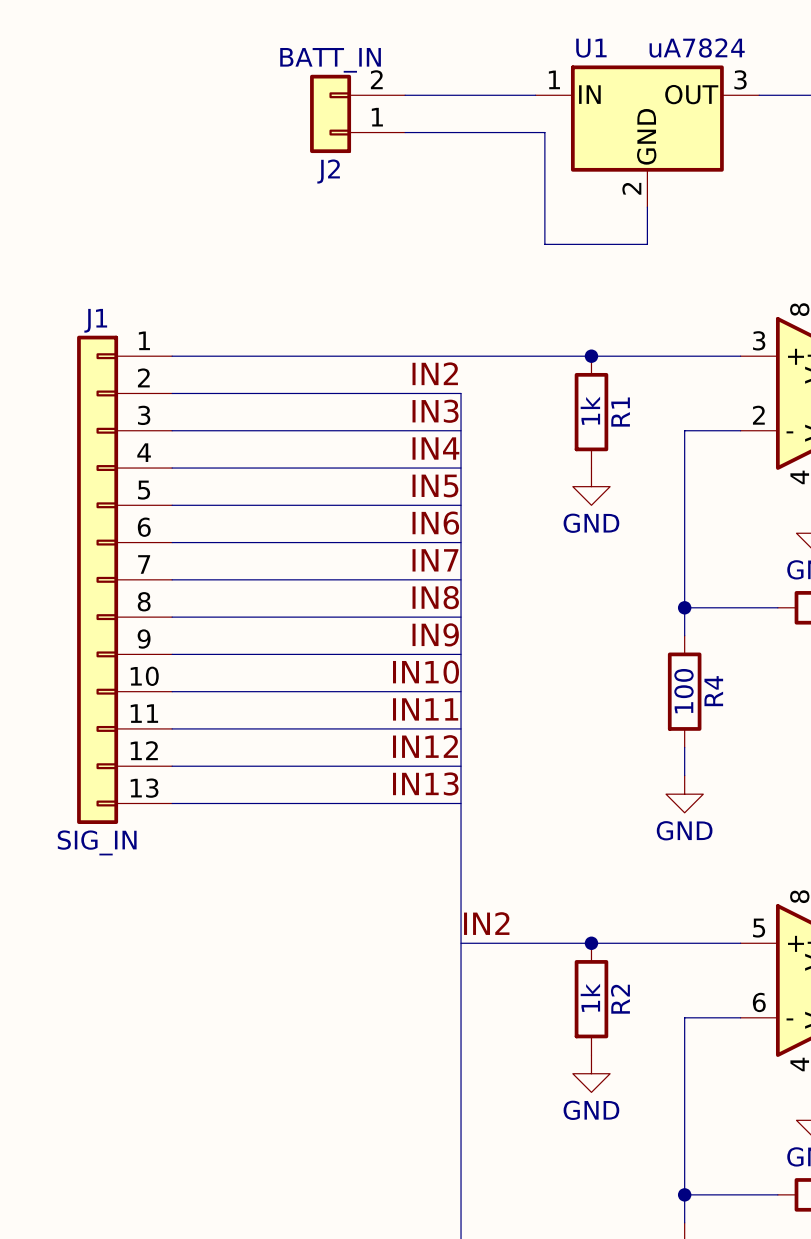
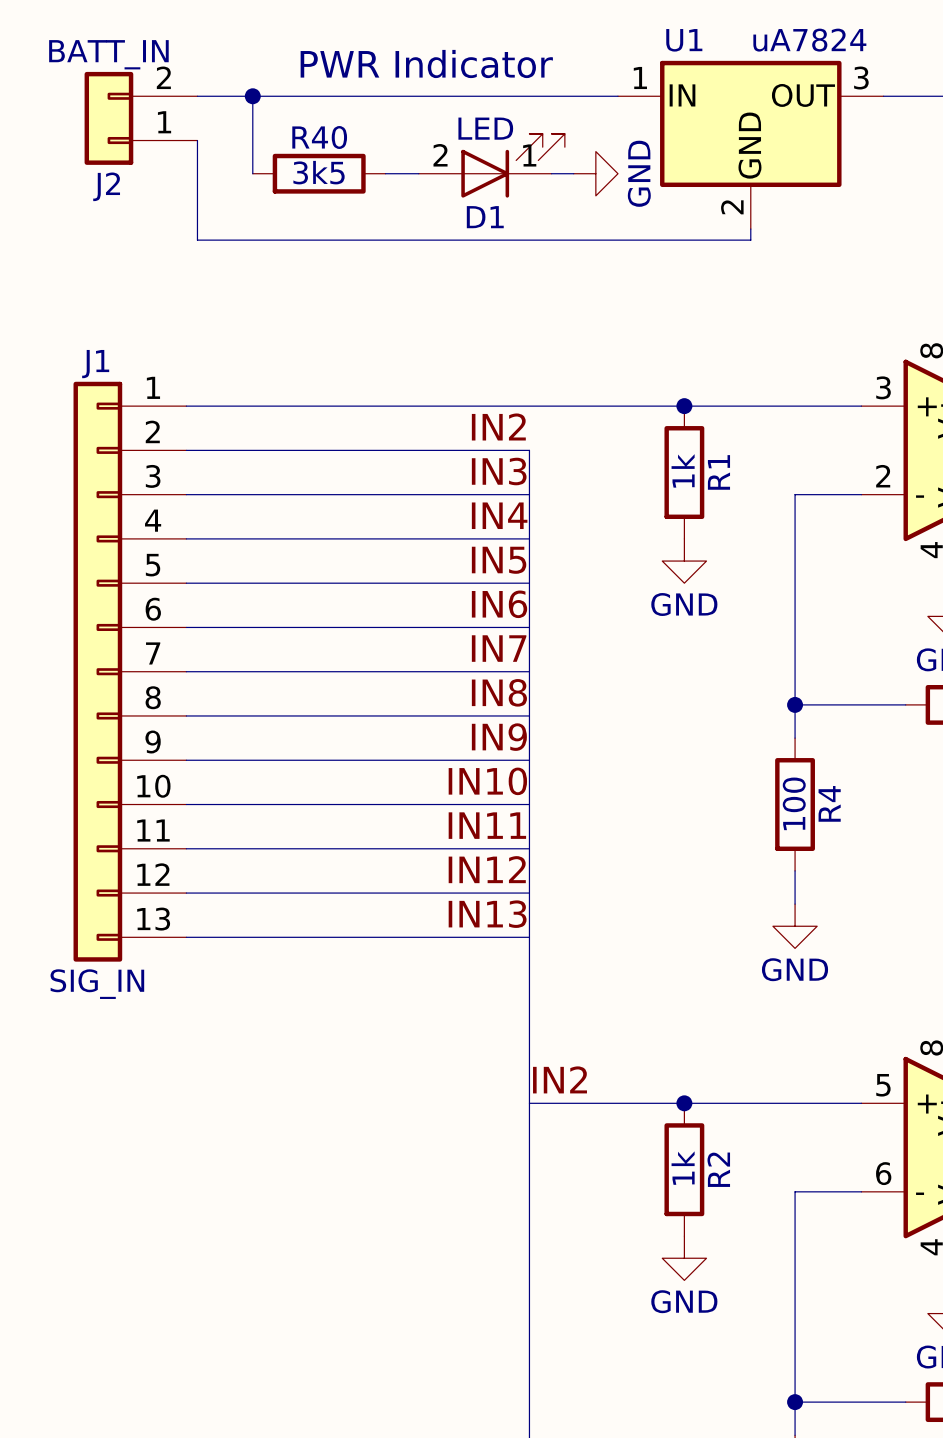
text: none -> PWR Indicator (426, 64)
wire: none -> (197, 96) (463, 96)
wire: none -> (252, 96) (252, 173)
junction: none -> (252, 96)
J2 position: (357, 113) -> (141, 118)
wire: (405, 132) (544, 132) (544, 244) (647, 244) (647, 216) -> (197, 140) (197, 240) (750, 240)
D1: none -> LED (491, 165)
R40: none -> 3k5 (319, 173)
wire: none -> (385, 173) (418, 173)
wire: none -> (551, 173) (573, 173)
power symbol: none -> GND (595, 173)

